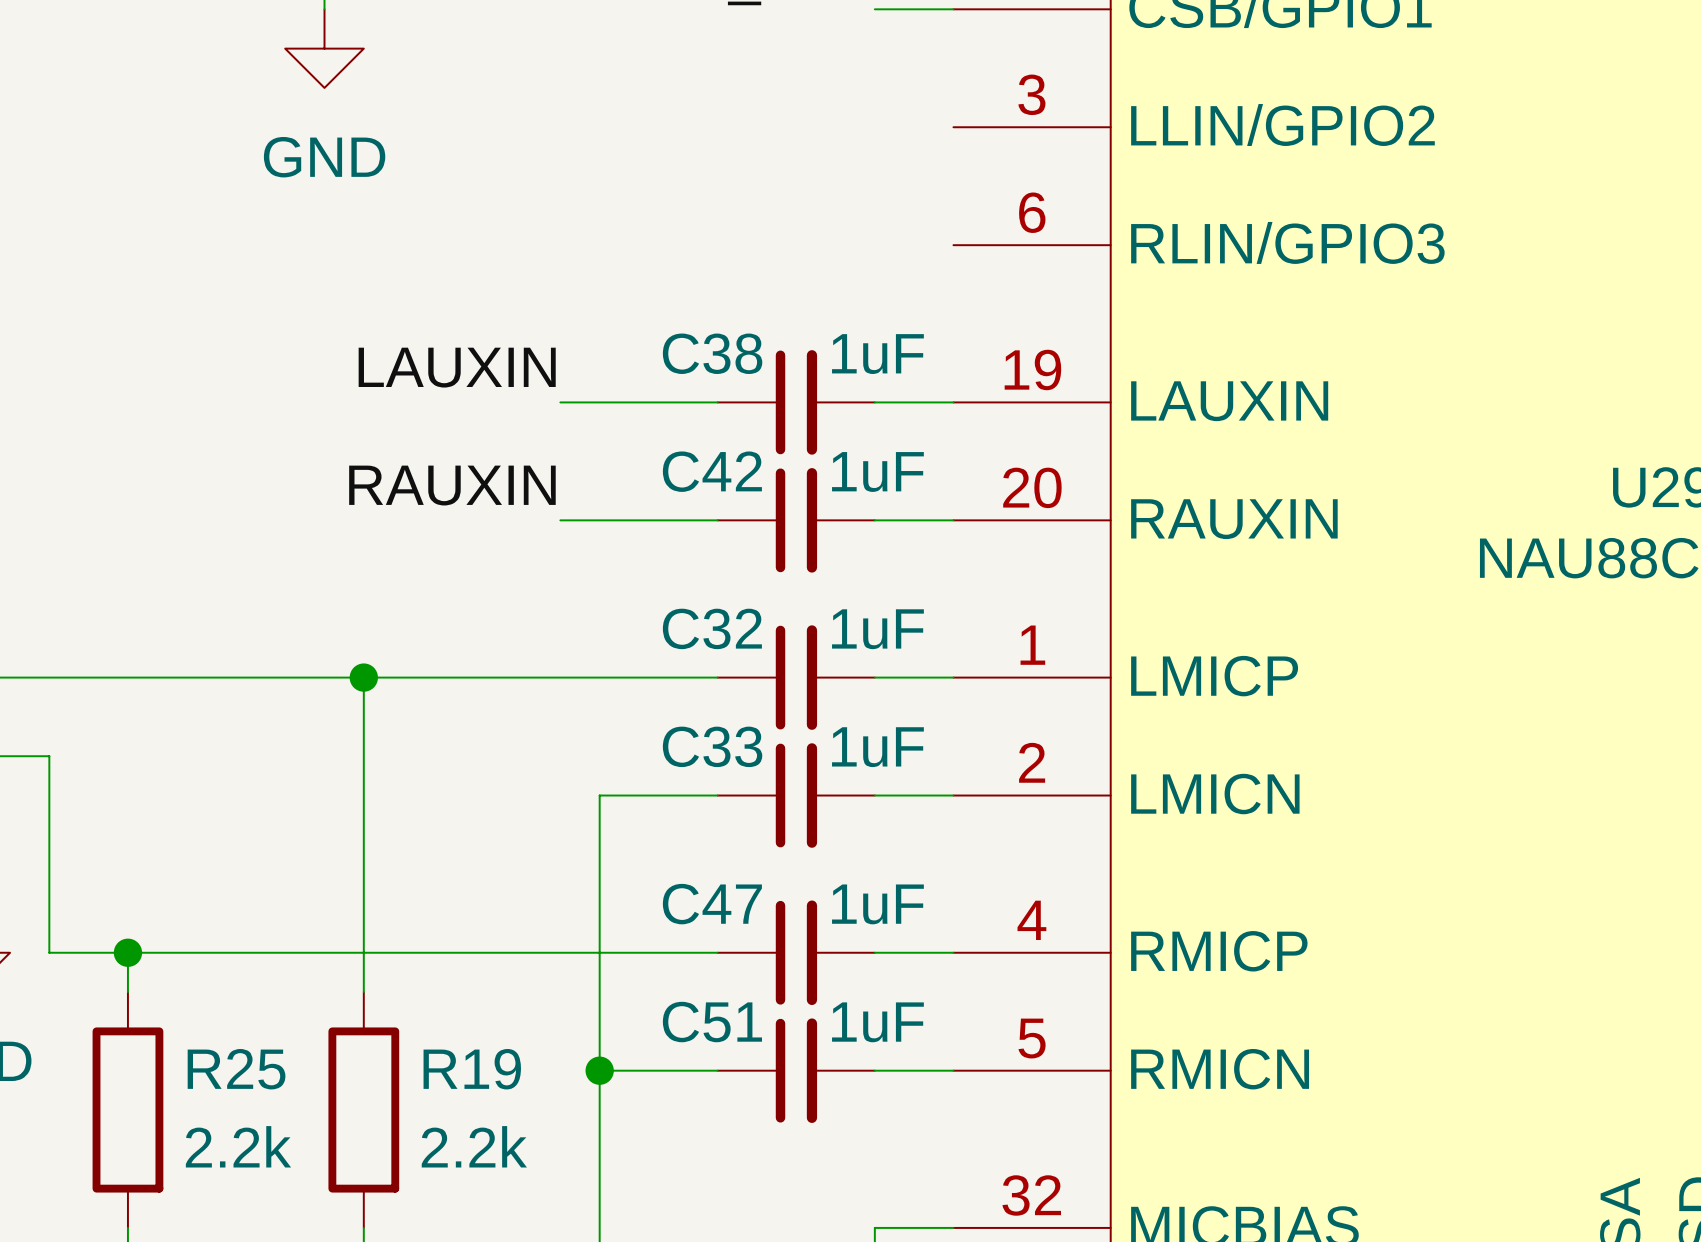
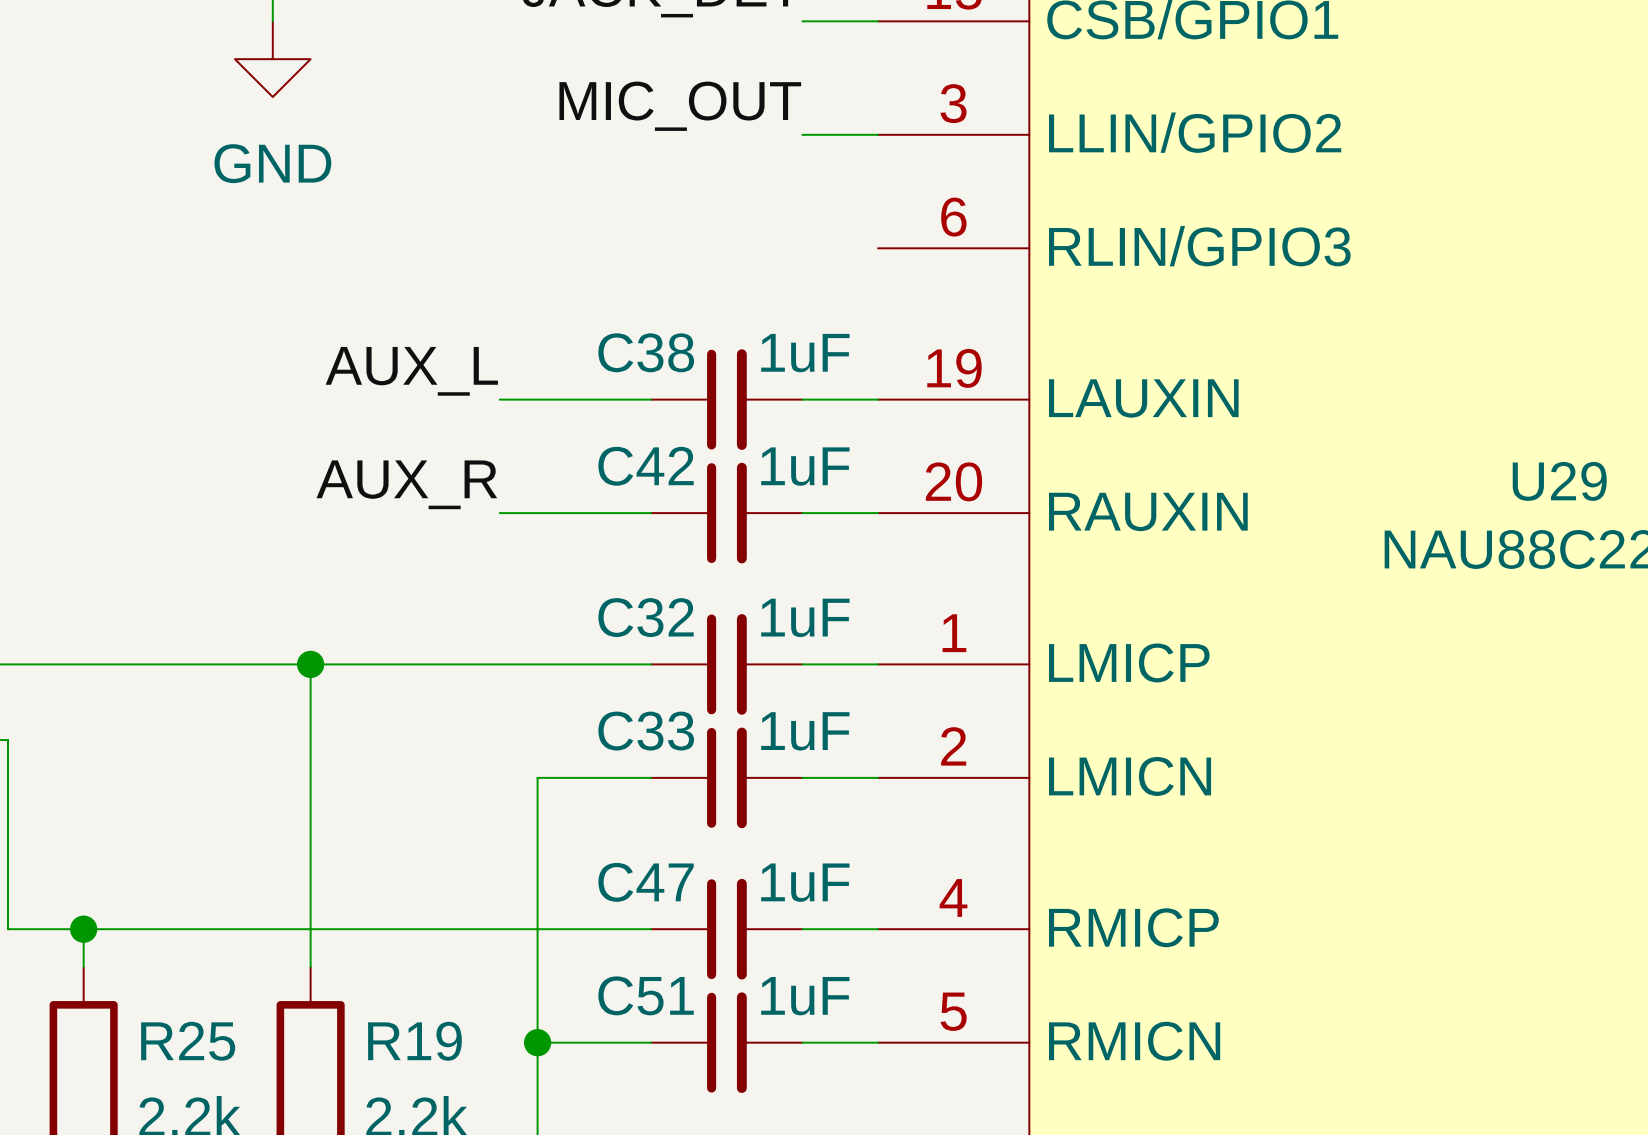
label: none -> MIC_OUT (680, 106)
wire: none -> (802, 134) (878, 134)
label: LAUXIN (457, 367) -> AUX_L (411, 371)
label: RAUXIN (452, 485) -> AUX_R (406, 484)

